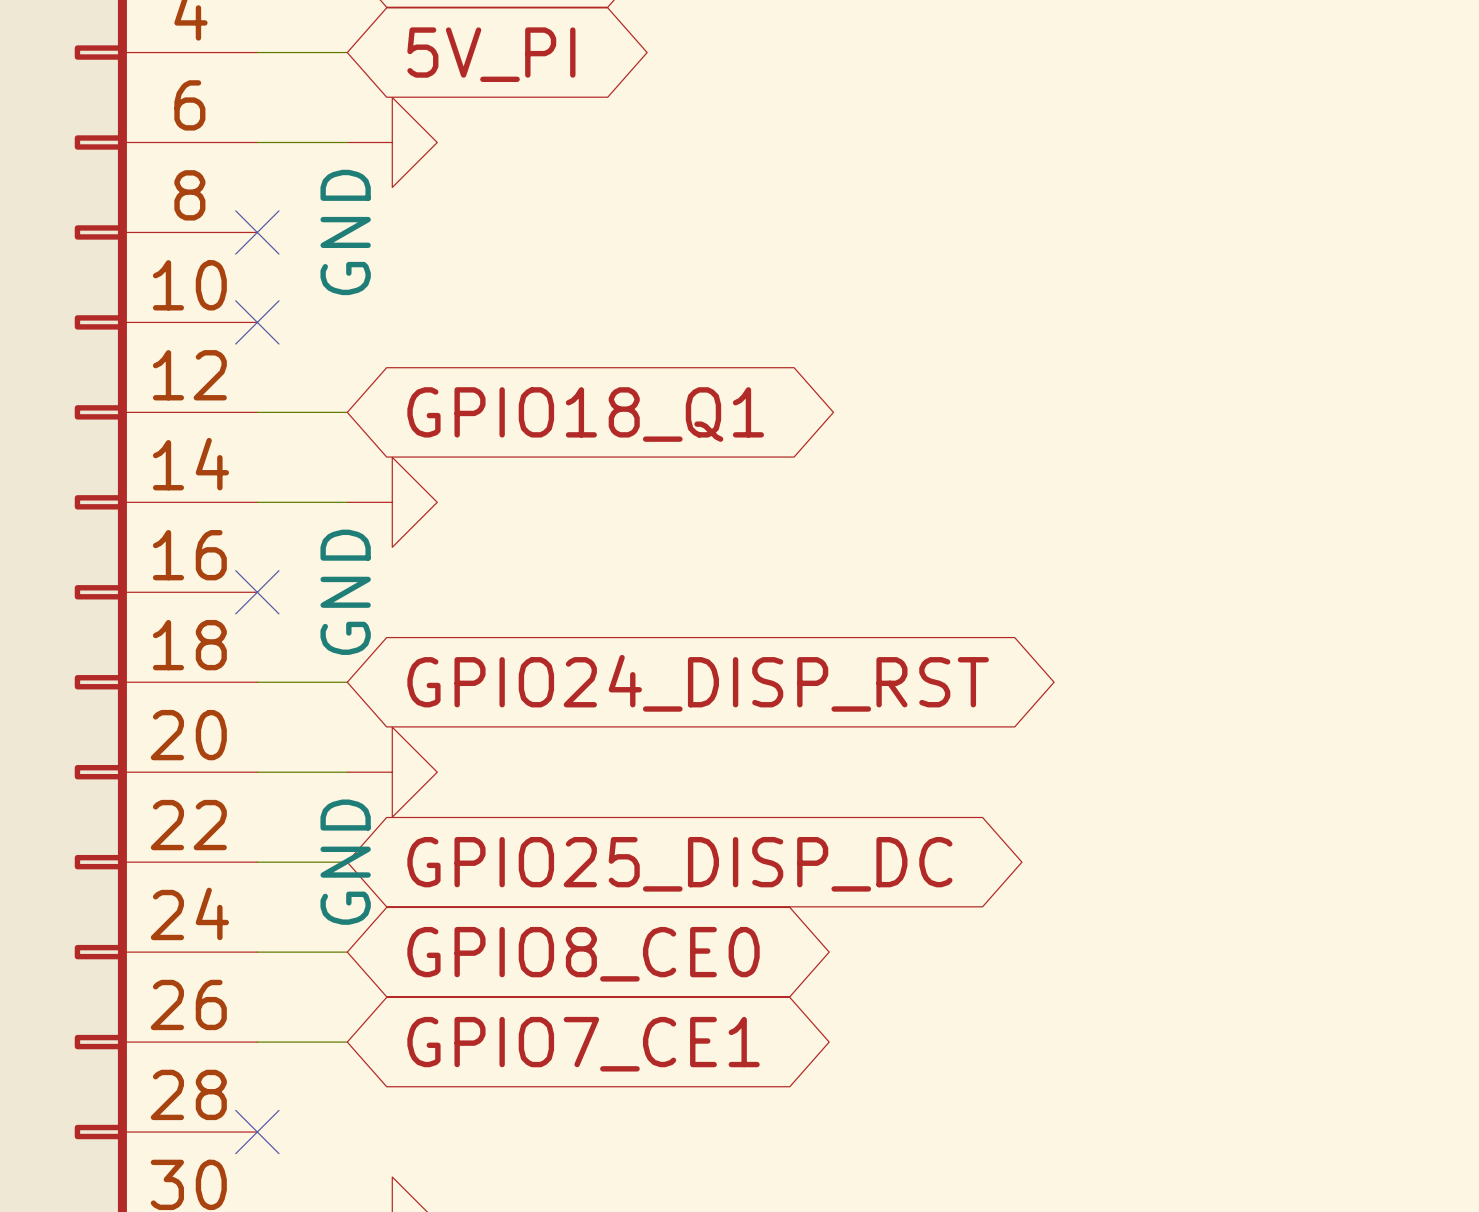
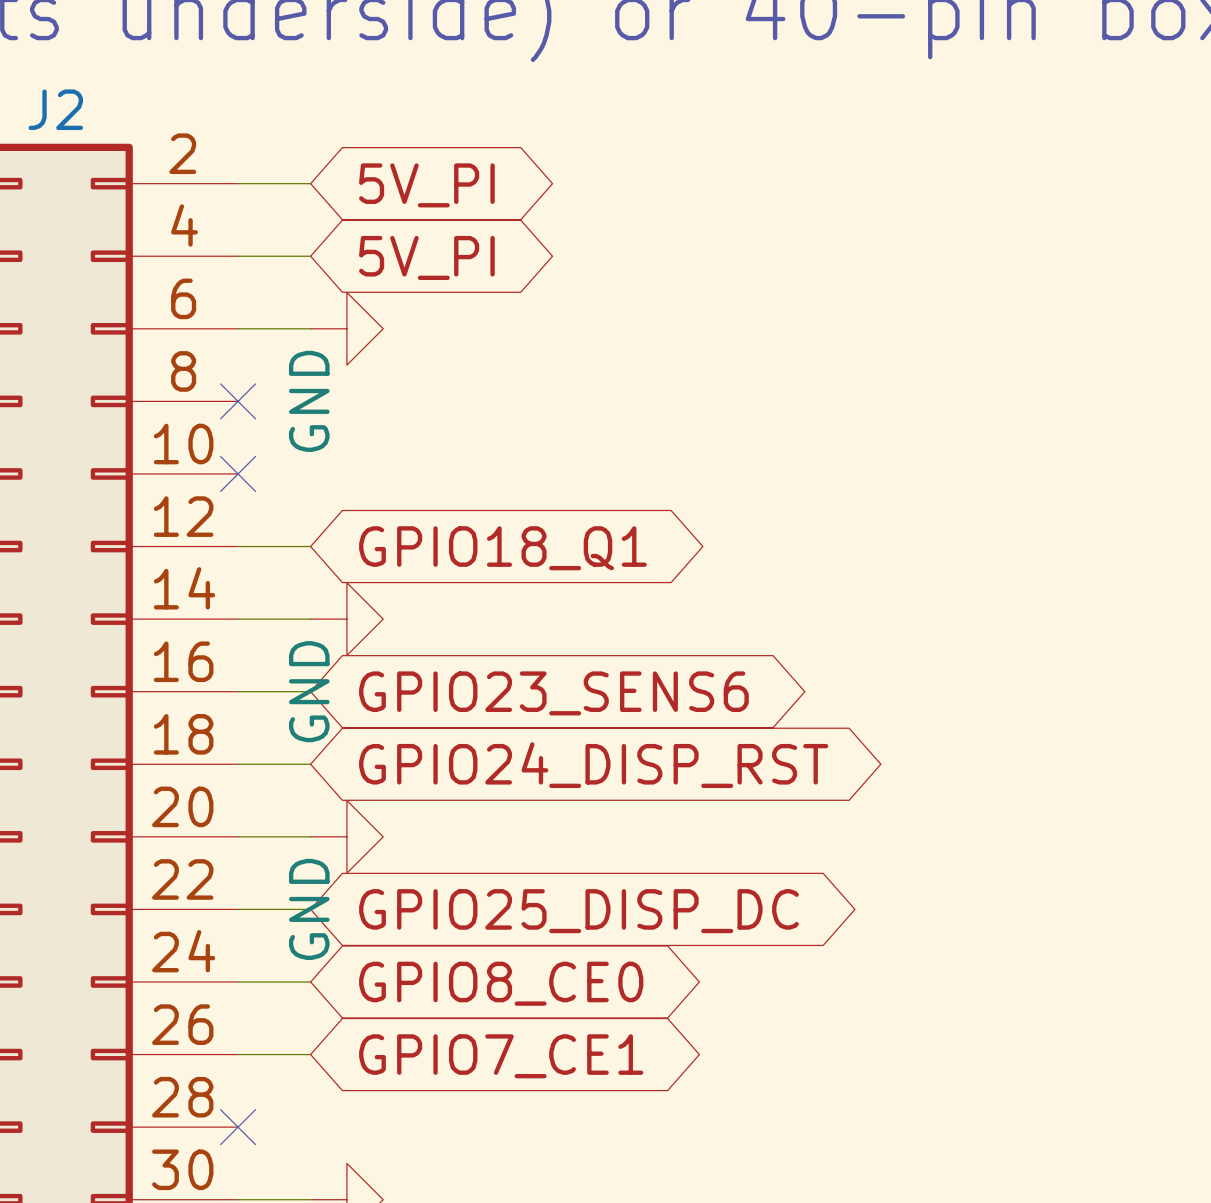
wire: none -> (238, 691) (310, 691)
no-connect mark: (257, 592) -> none
global label: none -> GPIO23_SENS6 (553, 693)

